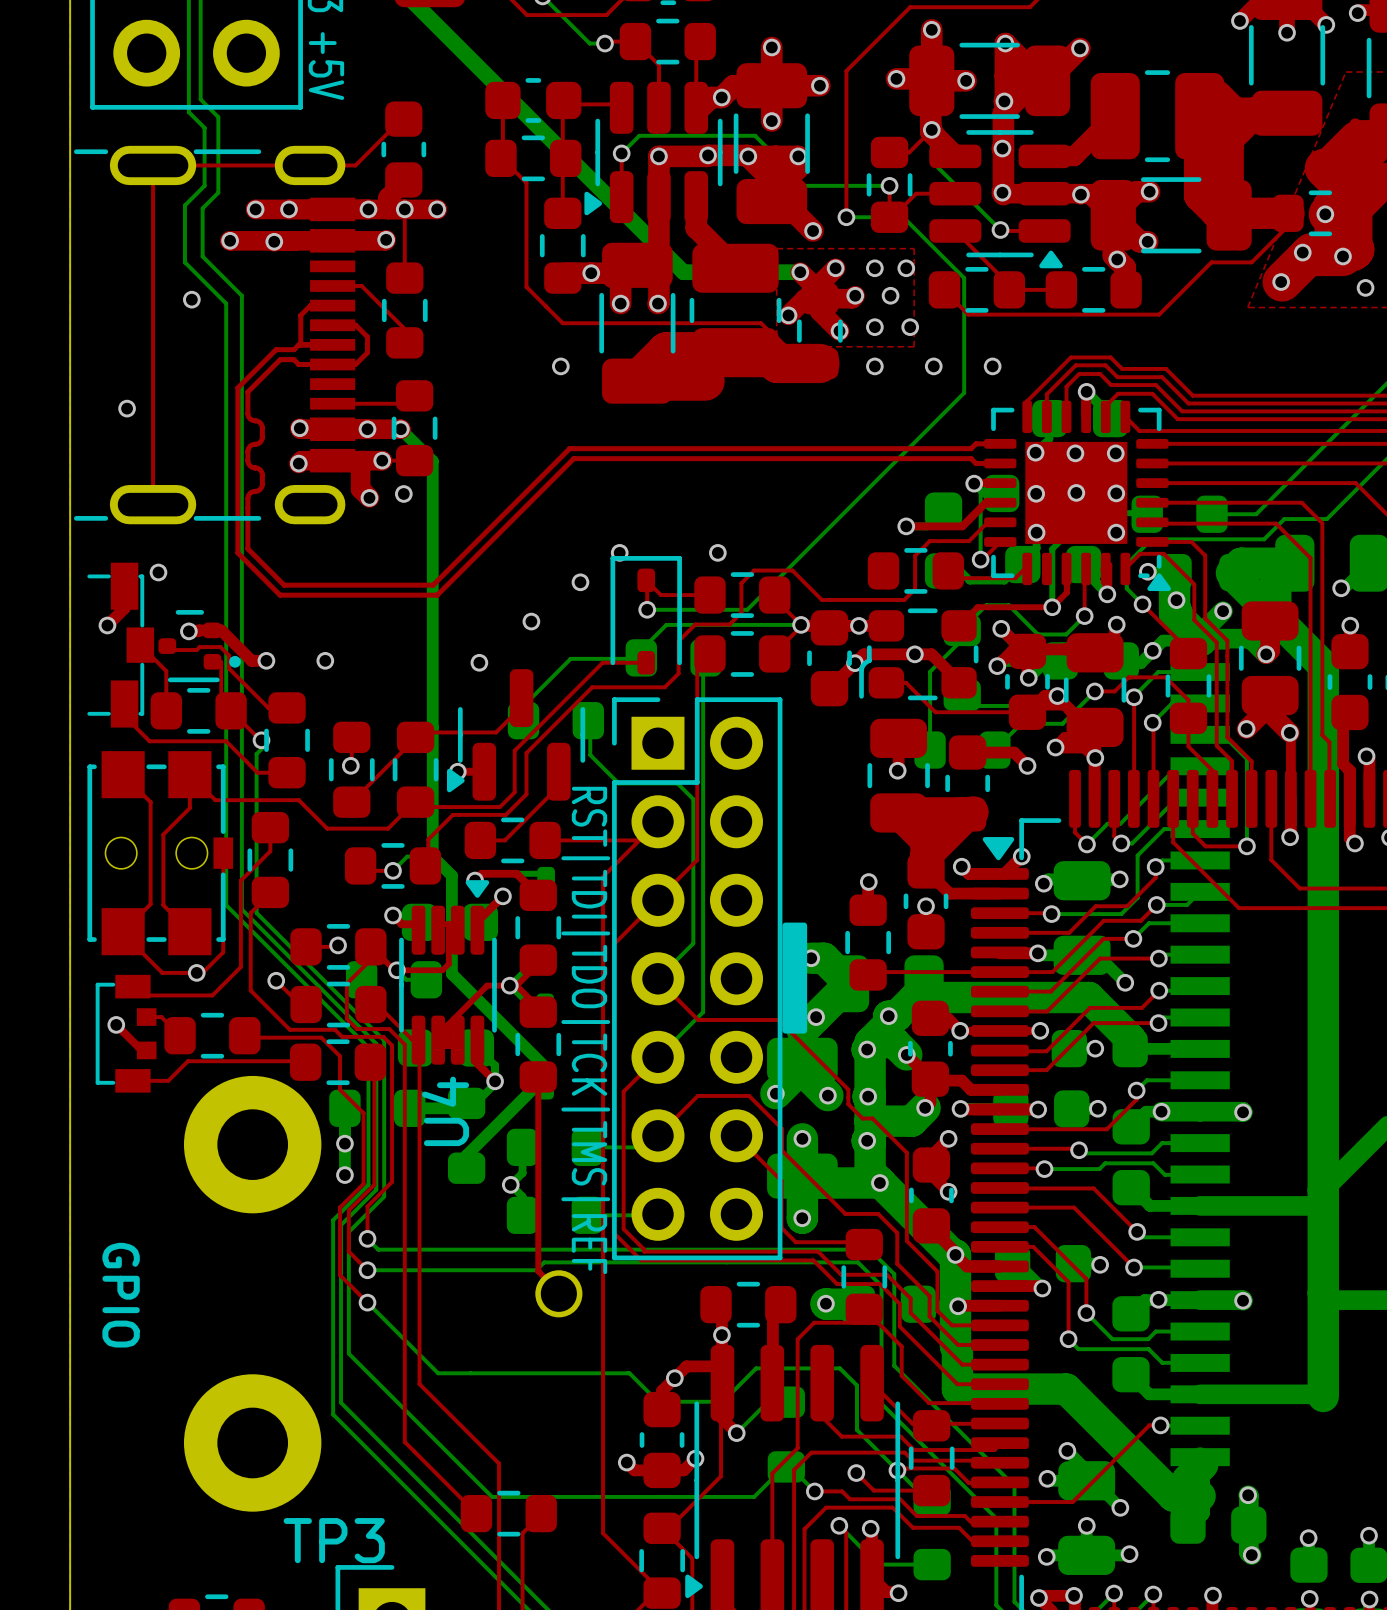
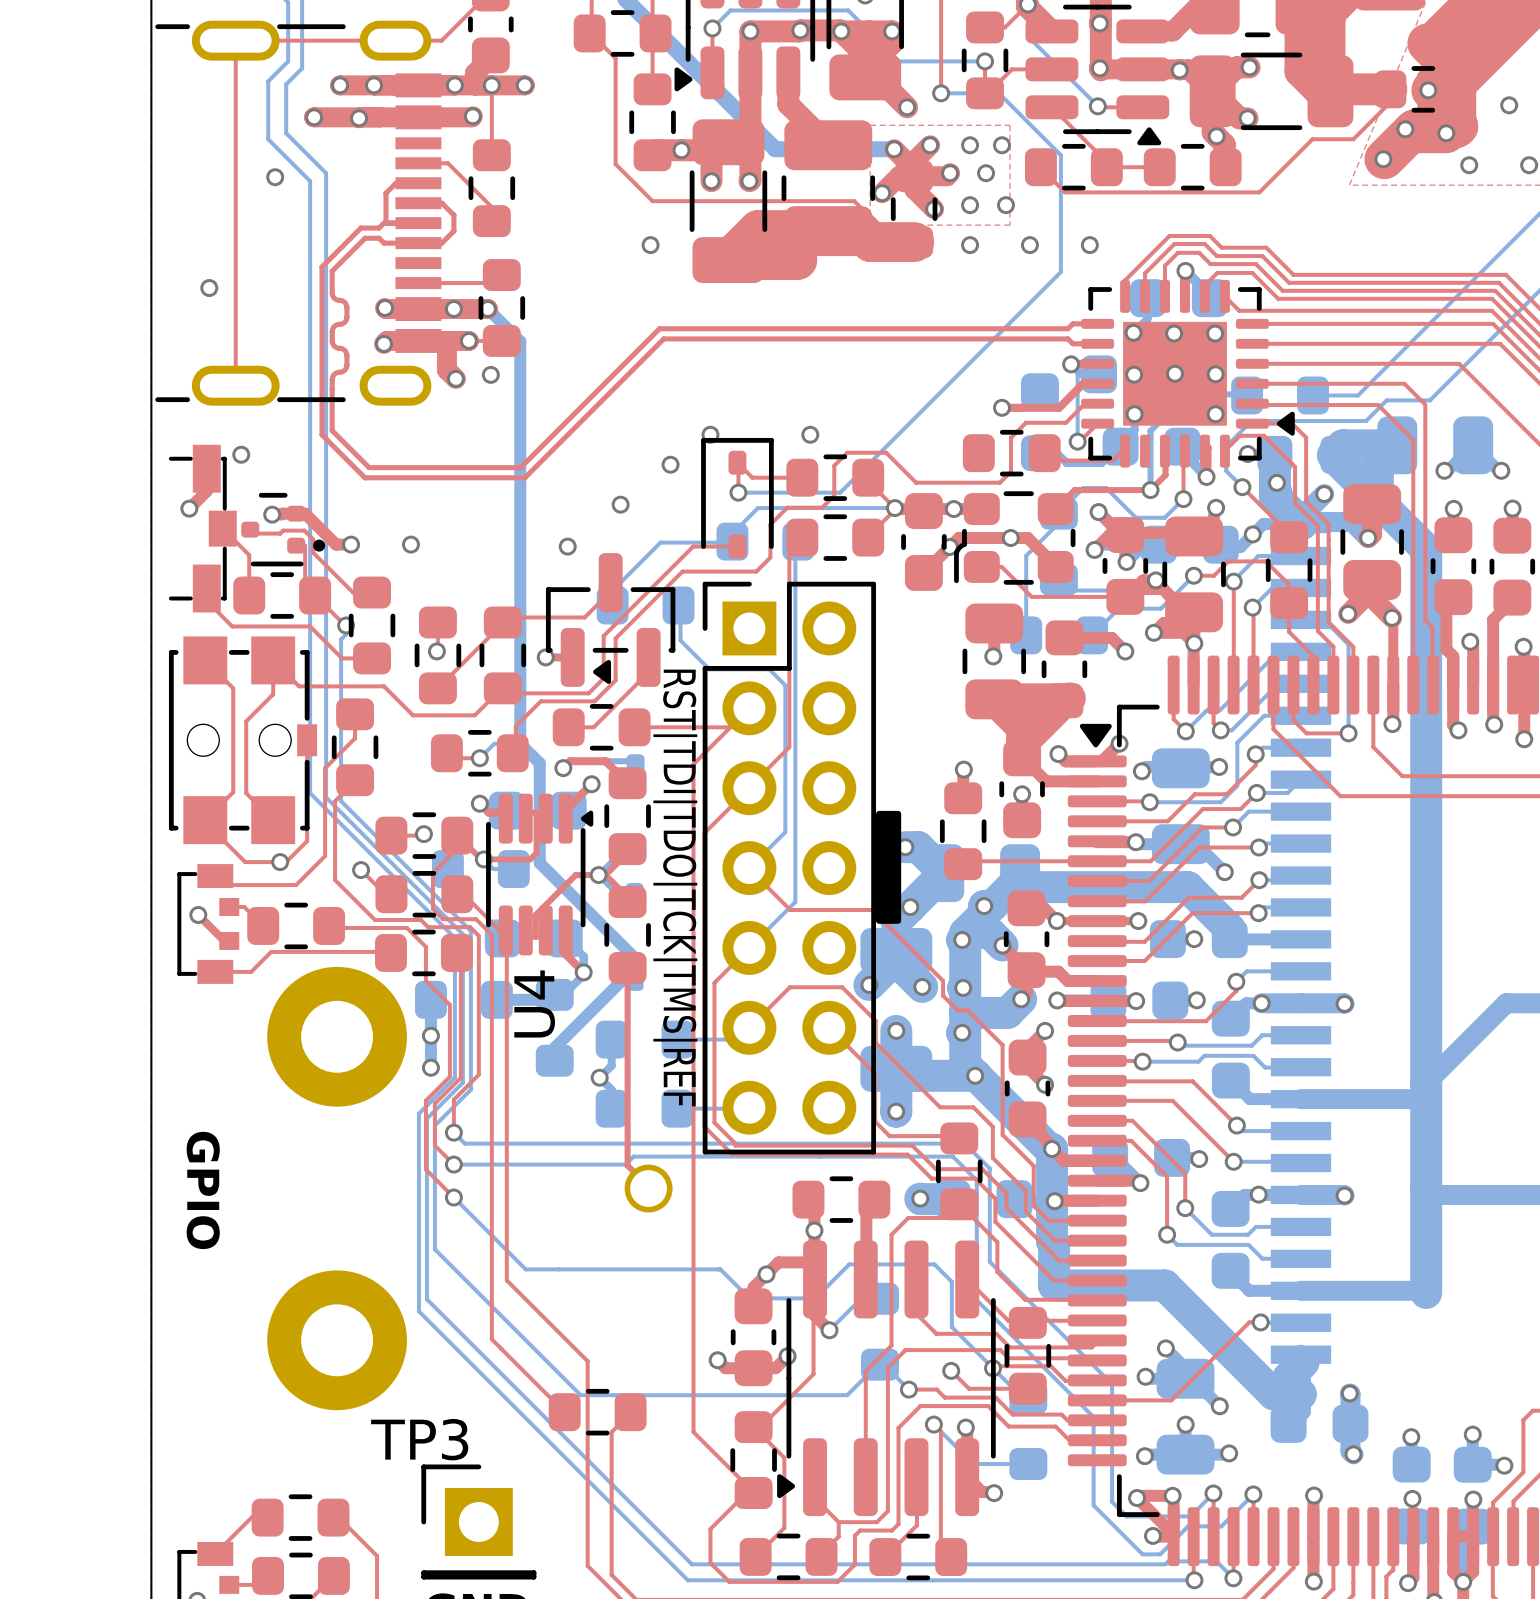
part footprint: [984, 400, 1171, 592] -> [1081, 279, 1295, 468]
part footprint: [446, 669, 586, 801] -> [545, 553, 676, 687]
U4 footprint: [399, 880, 497, 1065] -> [486, 793, 594, 956]

